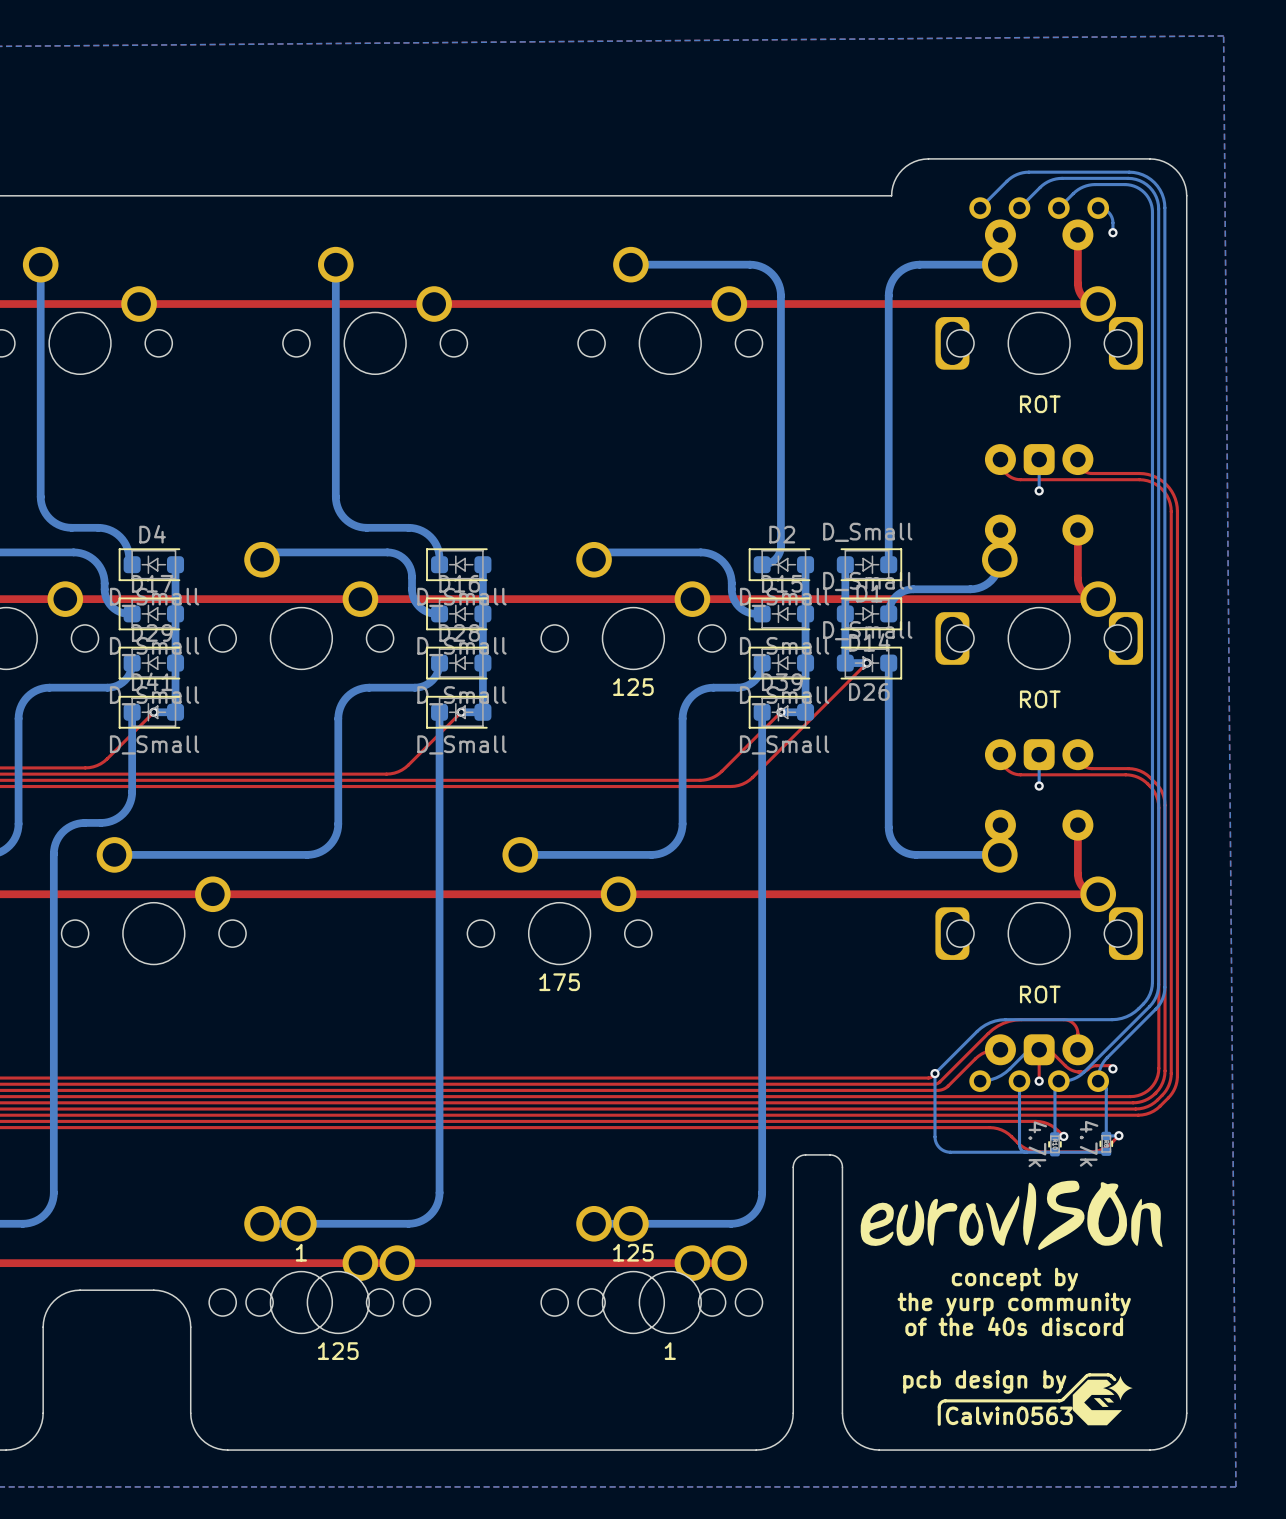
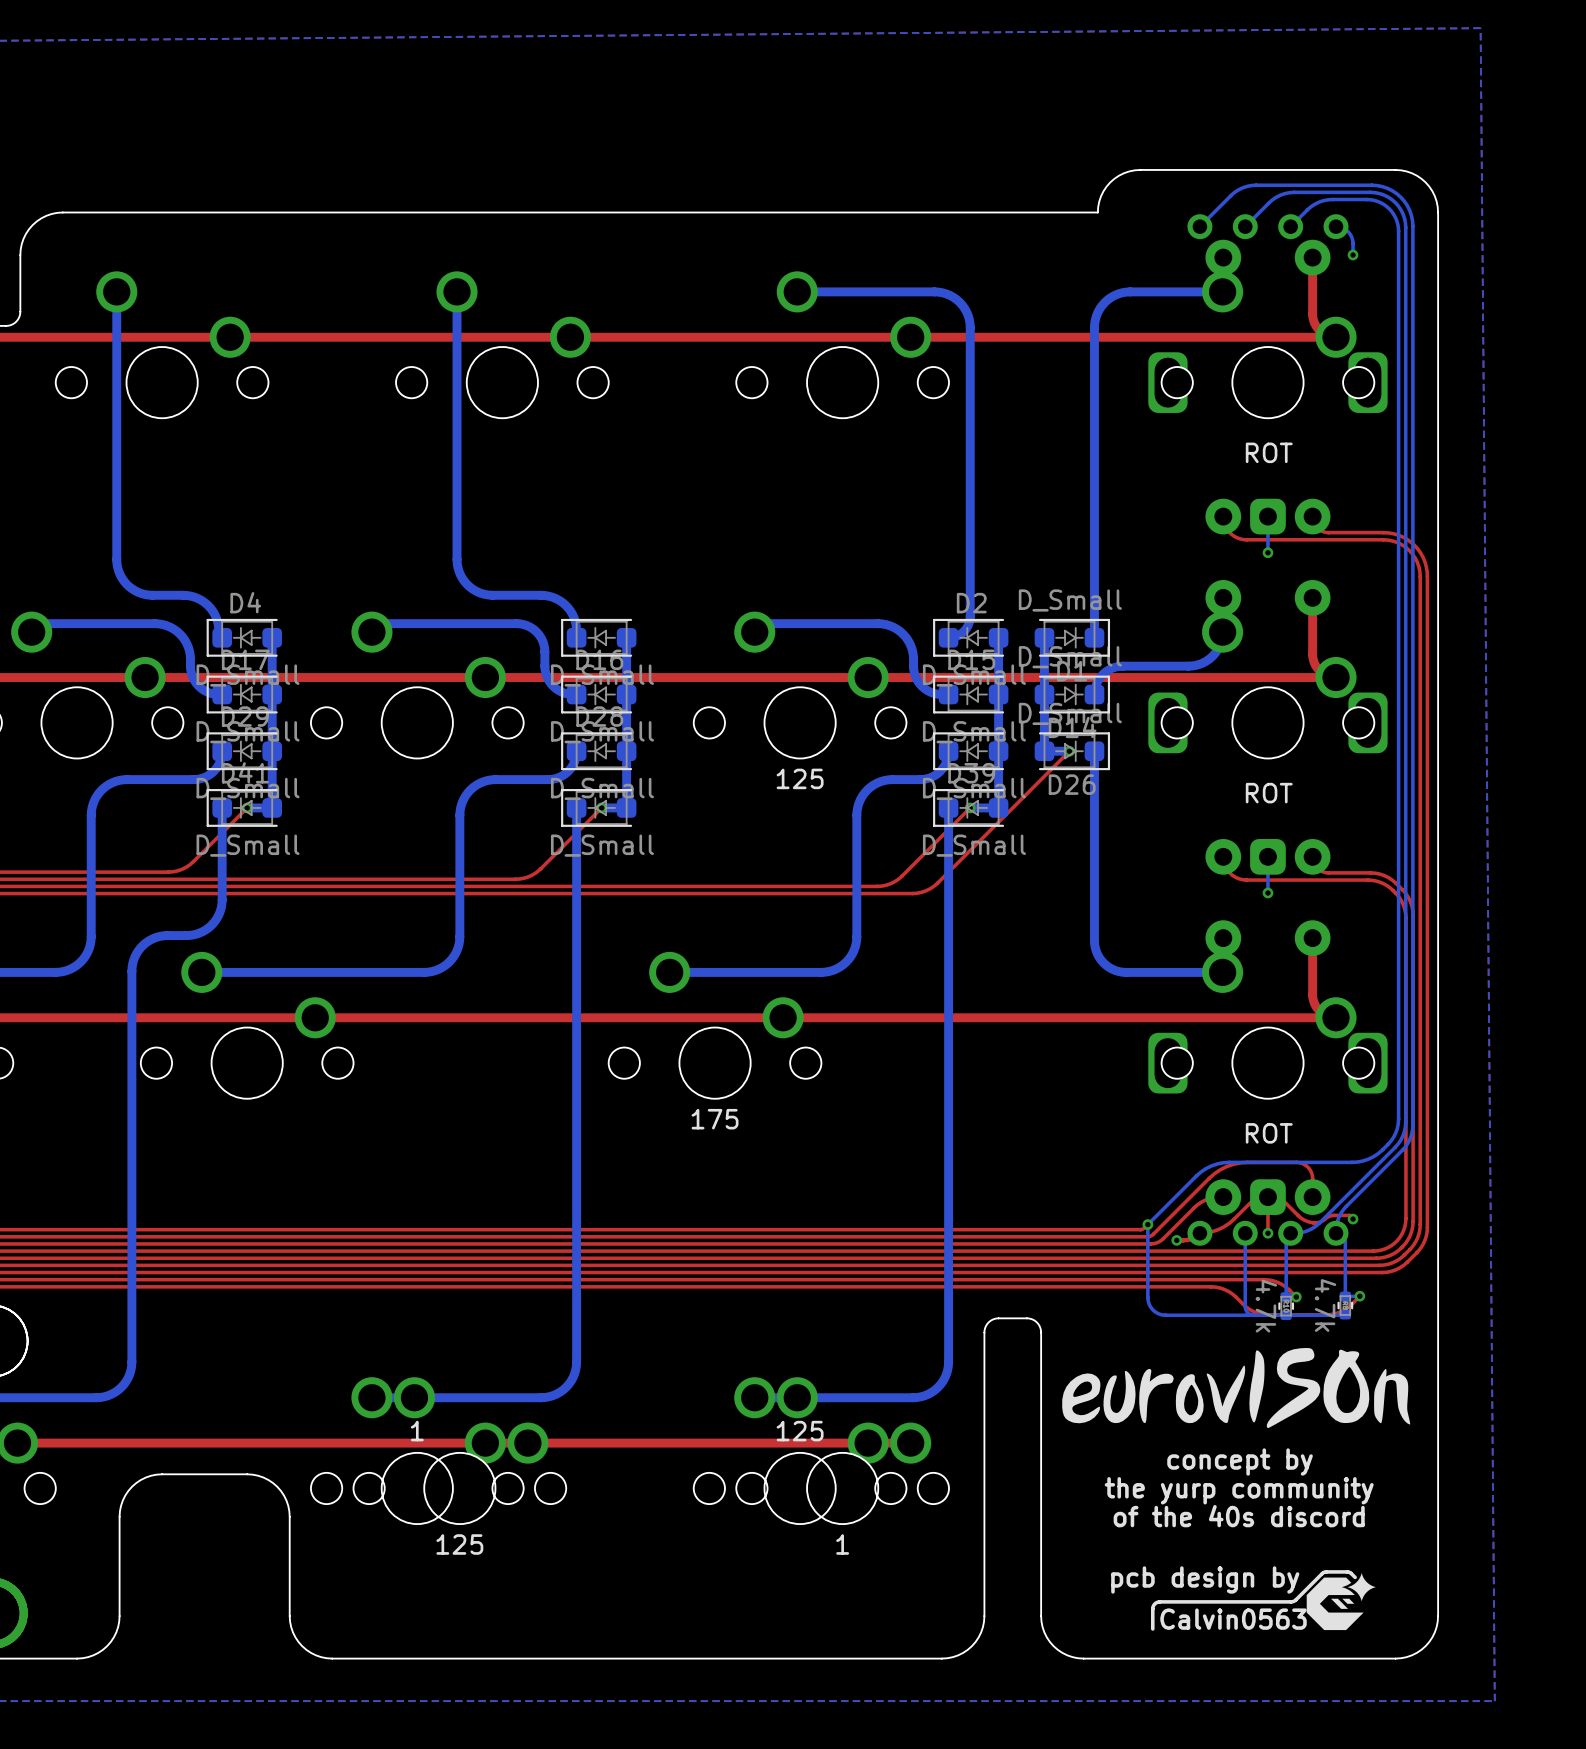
top track: none -> (1267, 1197) (1256, 1197) (1229, 1223) (1218, 1229) (1199, 1233) (1189, 1239) (1176, 1240)
bottom track: (1039, 1049) (1028, 1049) (1001, 1075) (980, 1081) -> none
via: none -> (1176, 1240)

